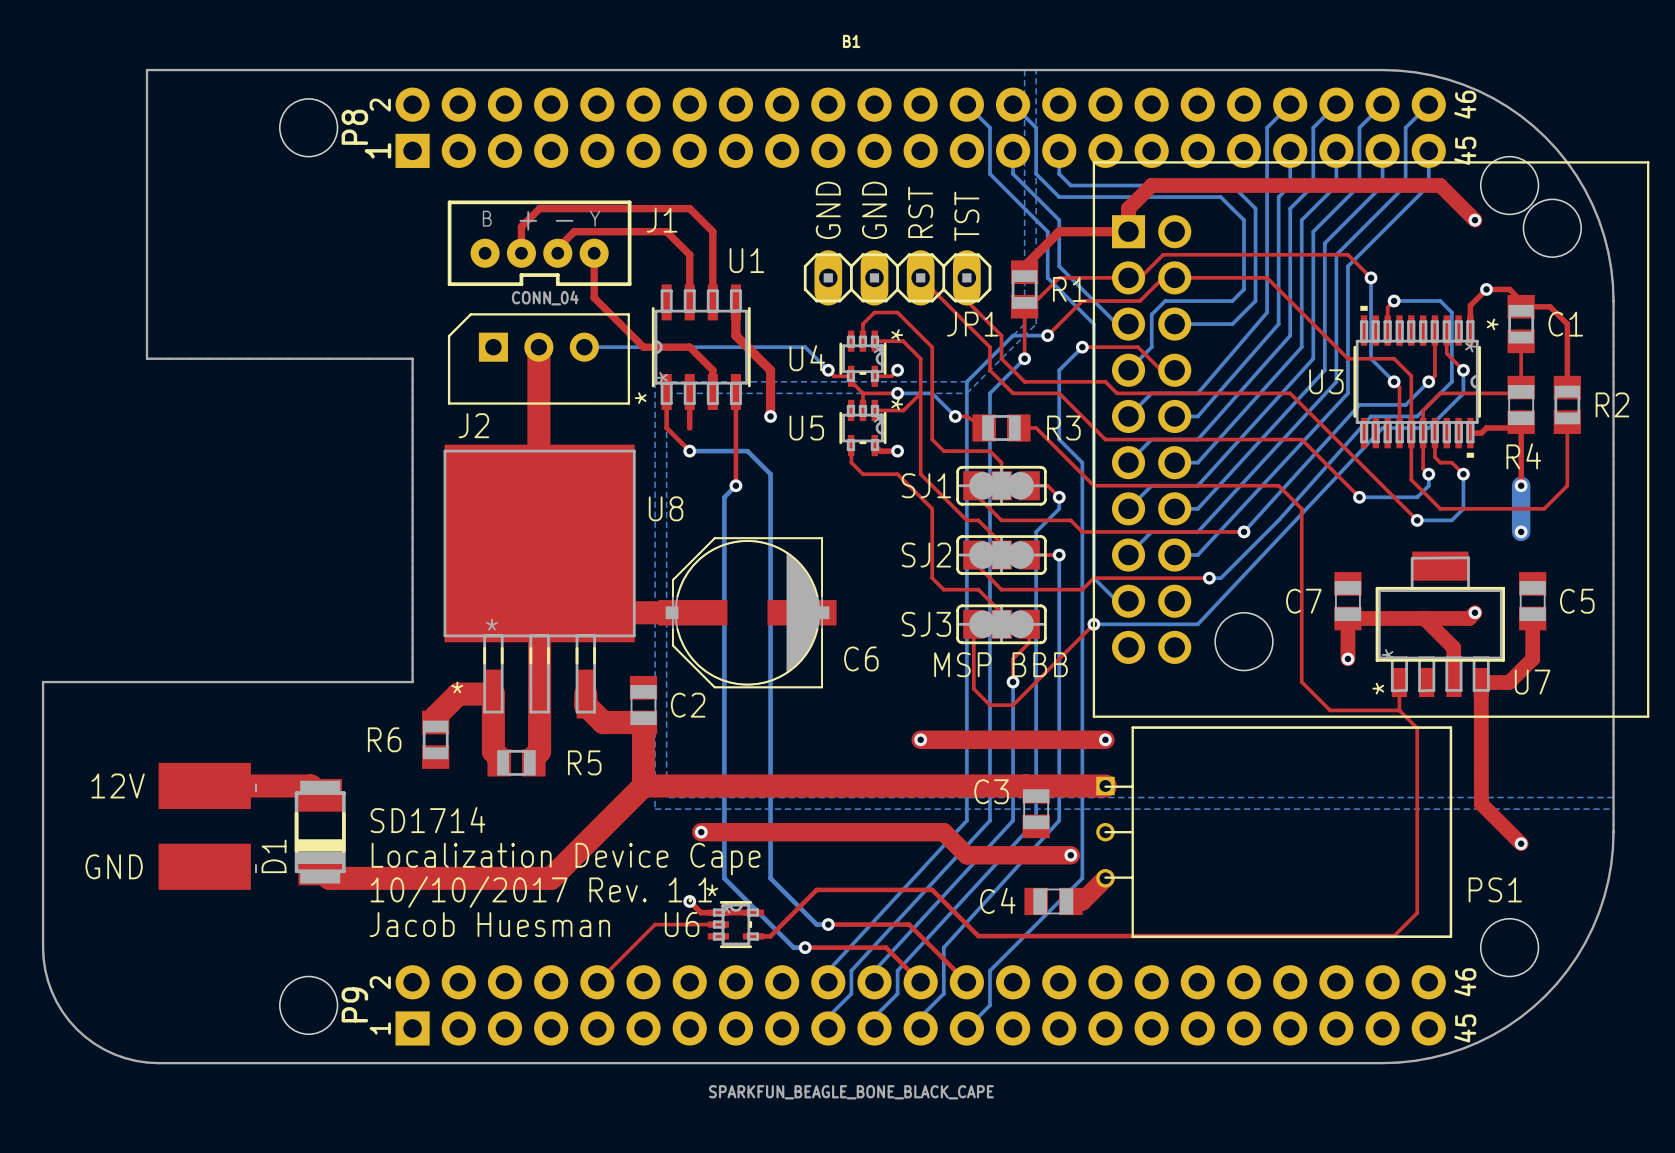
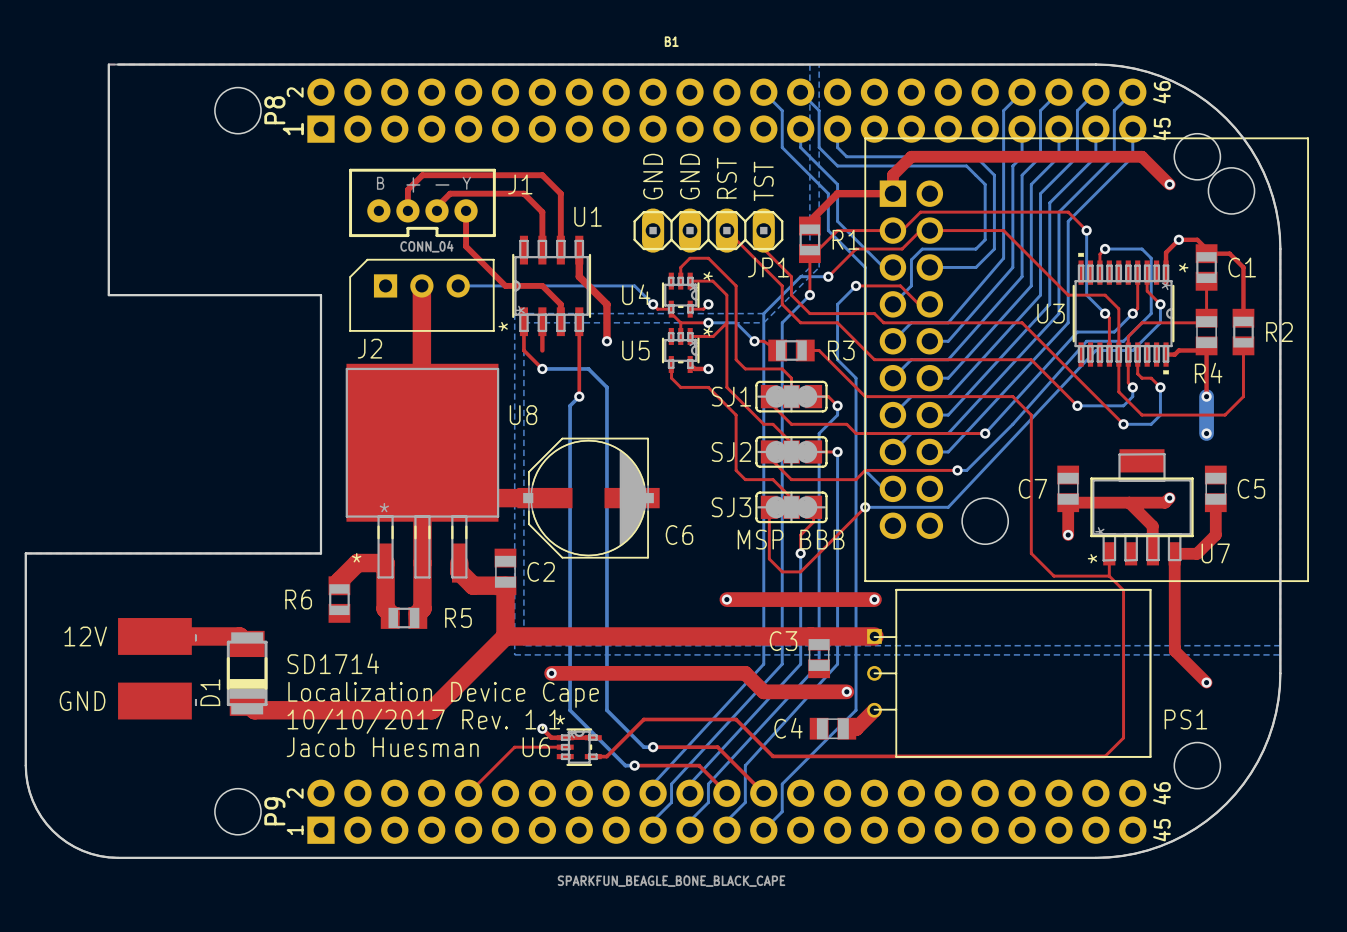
board edge: none -> (108, 64) (108, 295) (320, 295) (320, 553) (25, 553) (26, 774) (29, 792) (36, 809) (46, 824) (66, 842) (91, 853) (118, 857) (1109, 857) (1147, 850) (1184, 835) (1206, 821) (1226, 803) (1251, 773) (1268, 737) (1276, 712) (1279, 686) (1279, 235) (1272, 197) (1257, 160) (1243, 138) (1226, 118) (1195, 93) (1172, 81) (1147, 72) (1122, 66) (1095, 64) (118, 64)

